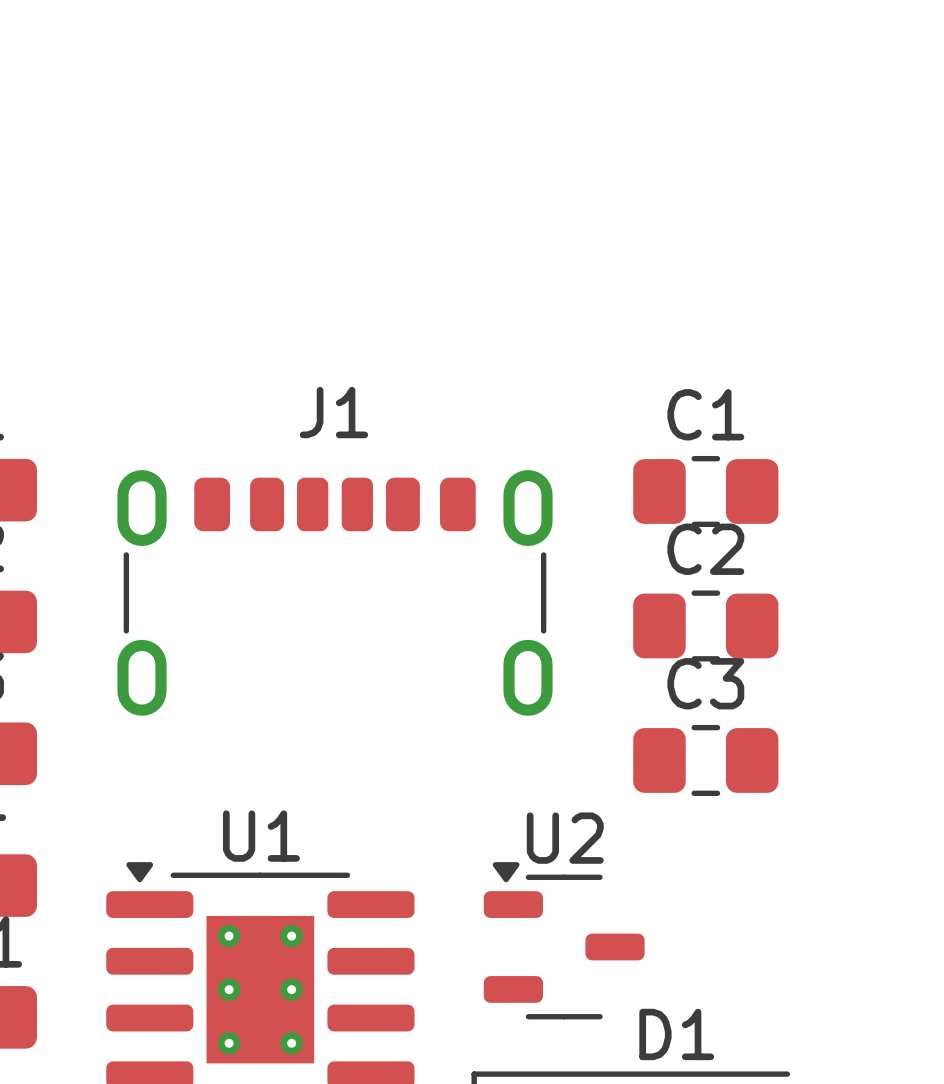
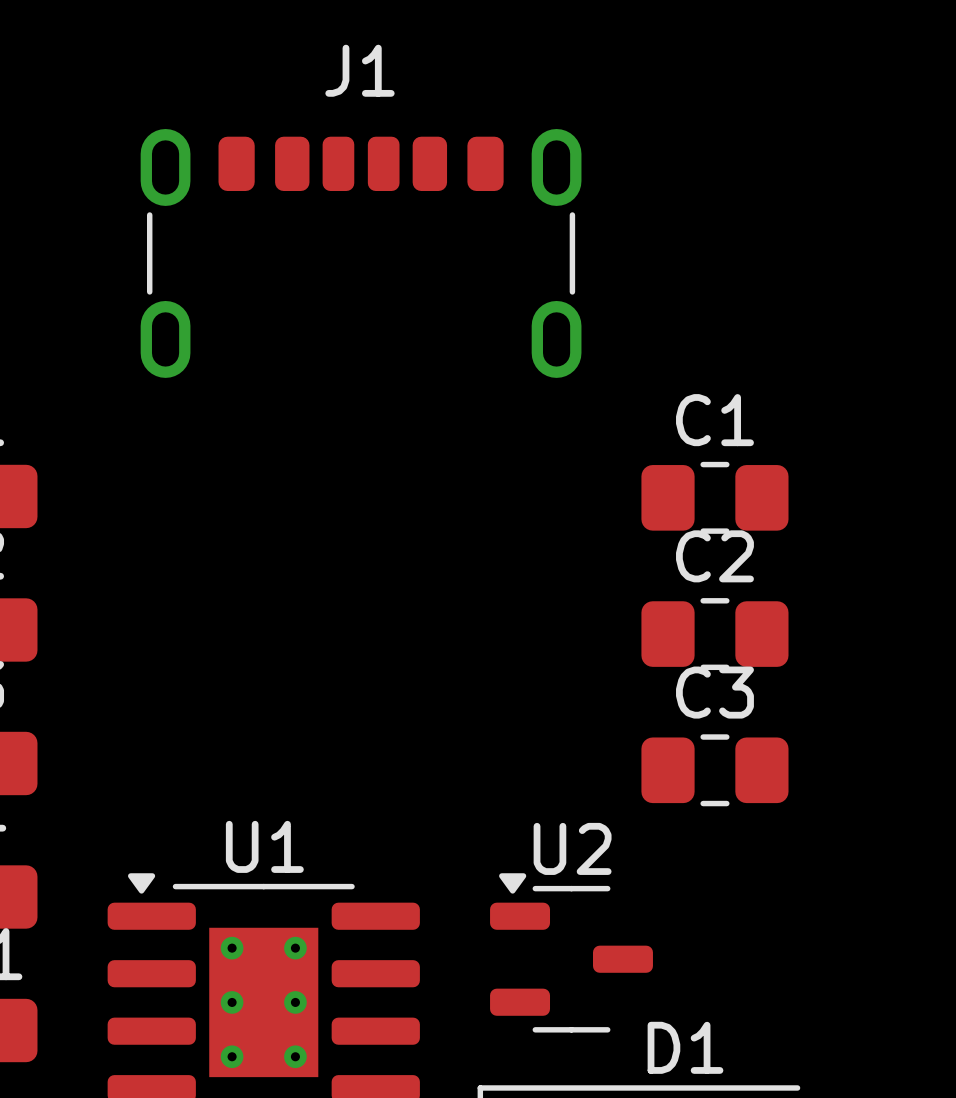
J1 position: (334, 592) -> (361, 253)

